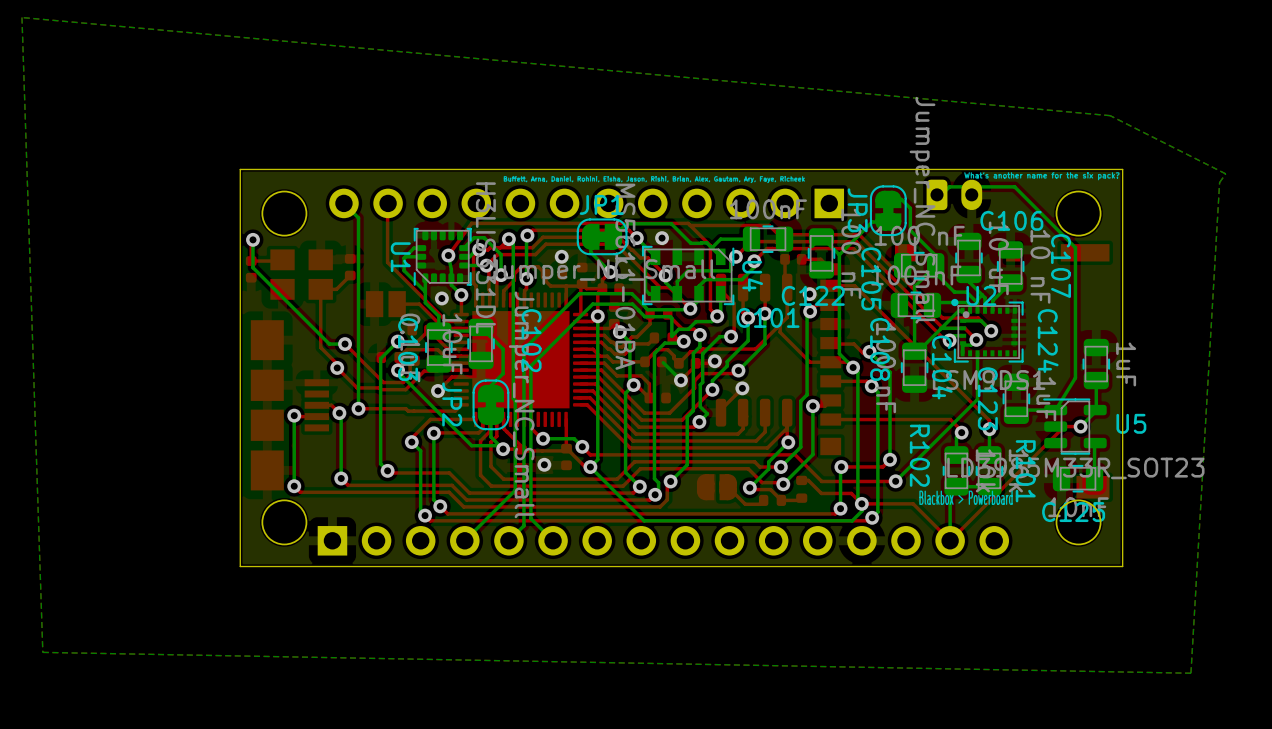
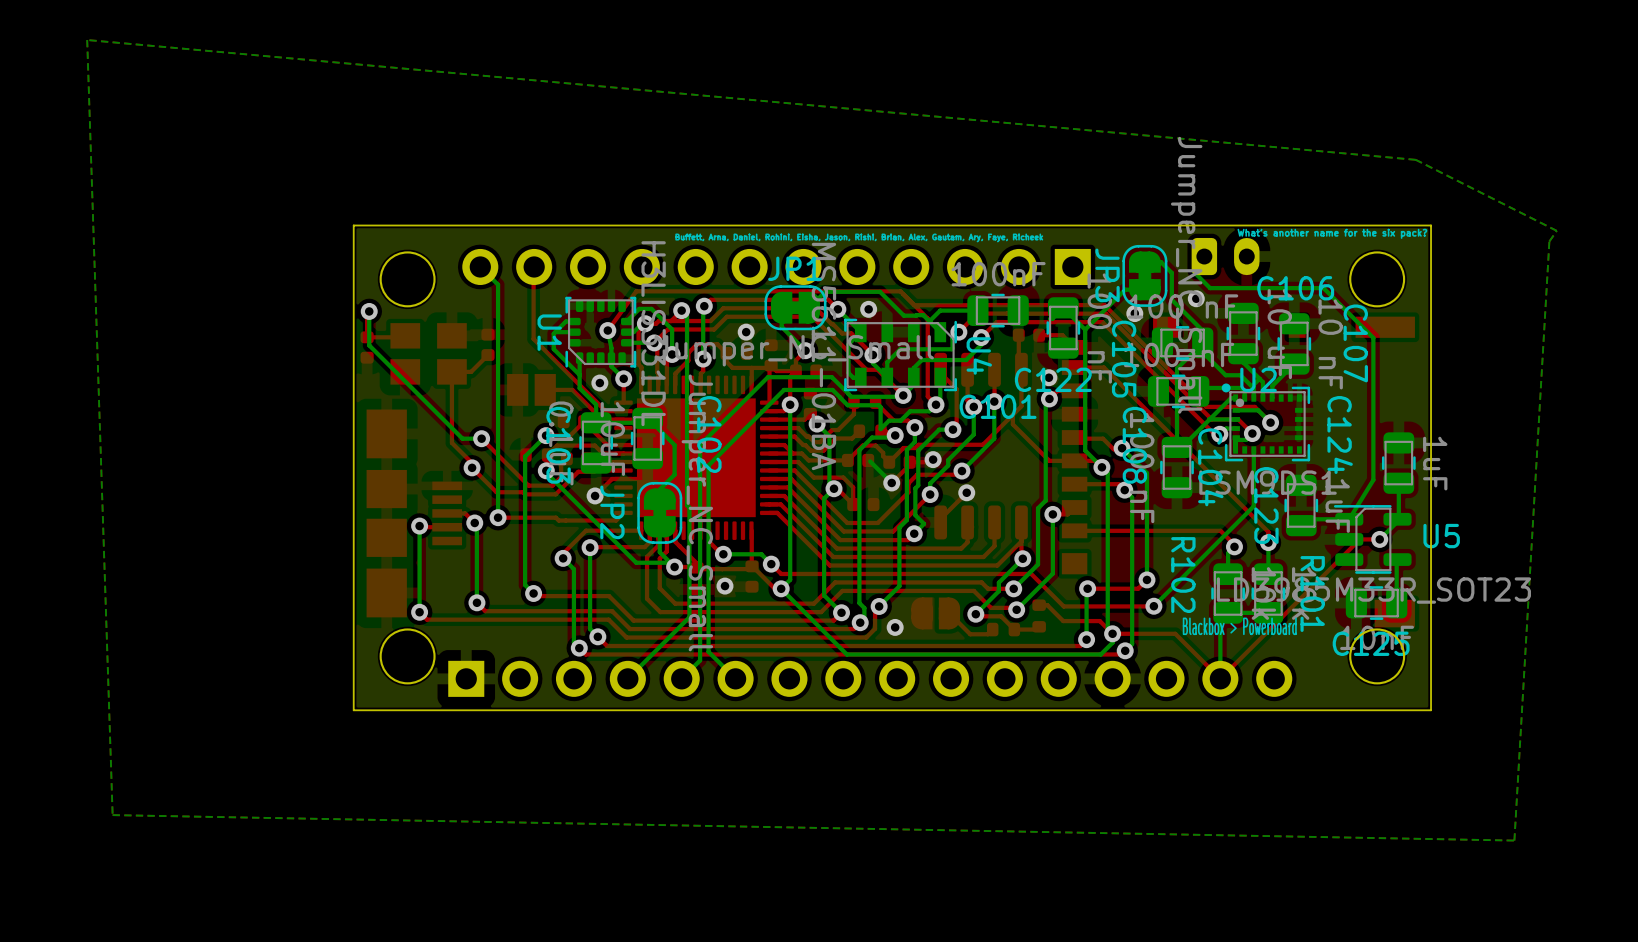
bottom track: (928, 207) (949, 186) (1014, 186) (1075, 247) (1075, 261) -> (1194, 272) (1210, 288) (1323, 288) (1373, 337)
top track: (690, 225) (769, 225) (778, 234) (859, 234) (942, 318) -> (973, 305) (1104, 305) (1206, 406) (1211, 406)
via: none -> (1196, 298)
top track: none -> (973, 305) (914, 305)
via: none -> (1134, 313)
via: none -> (895, 627)

